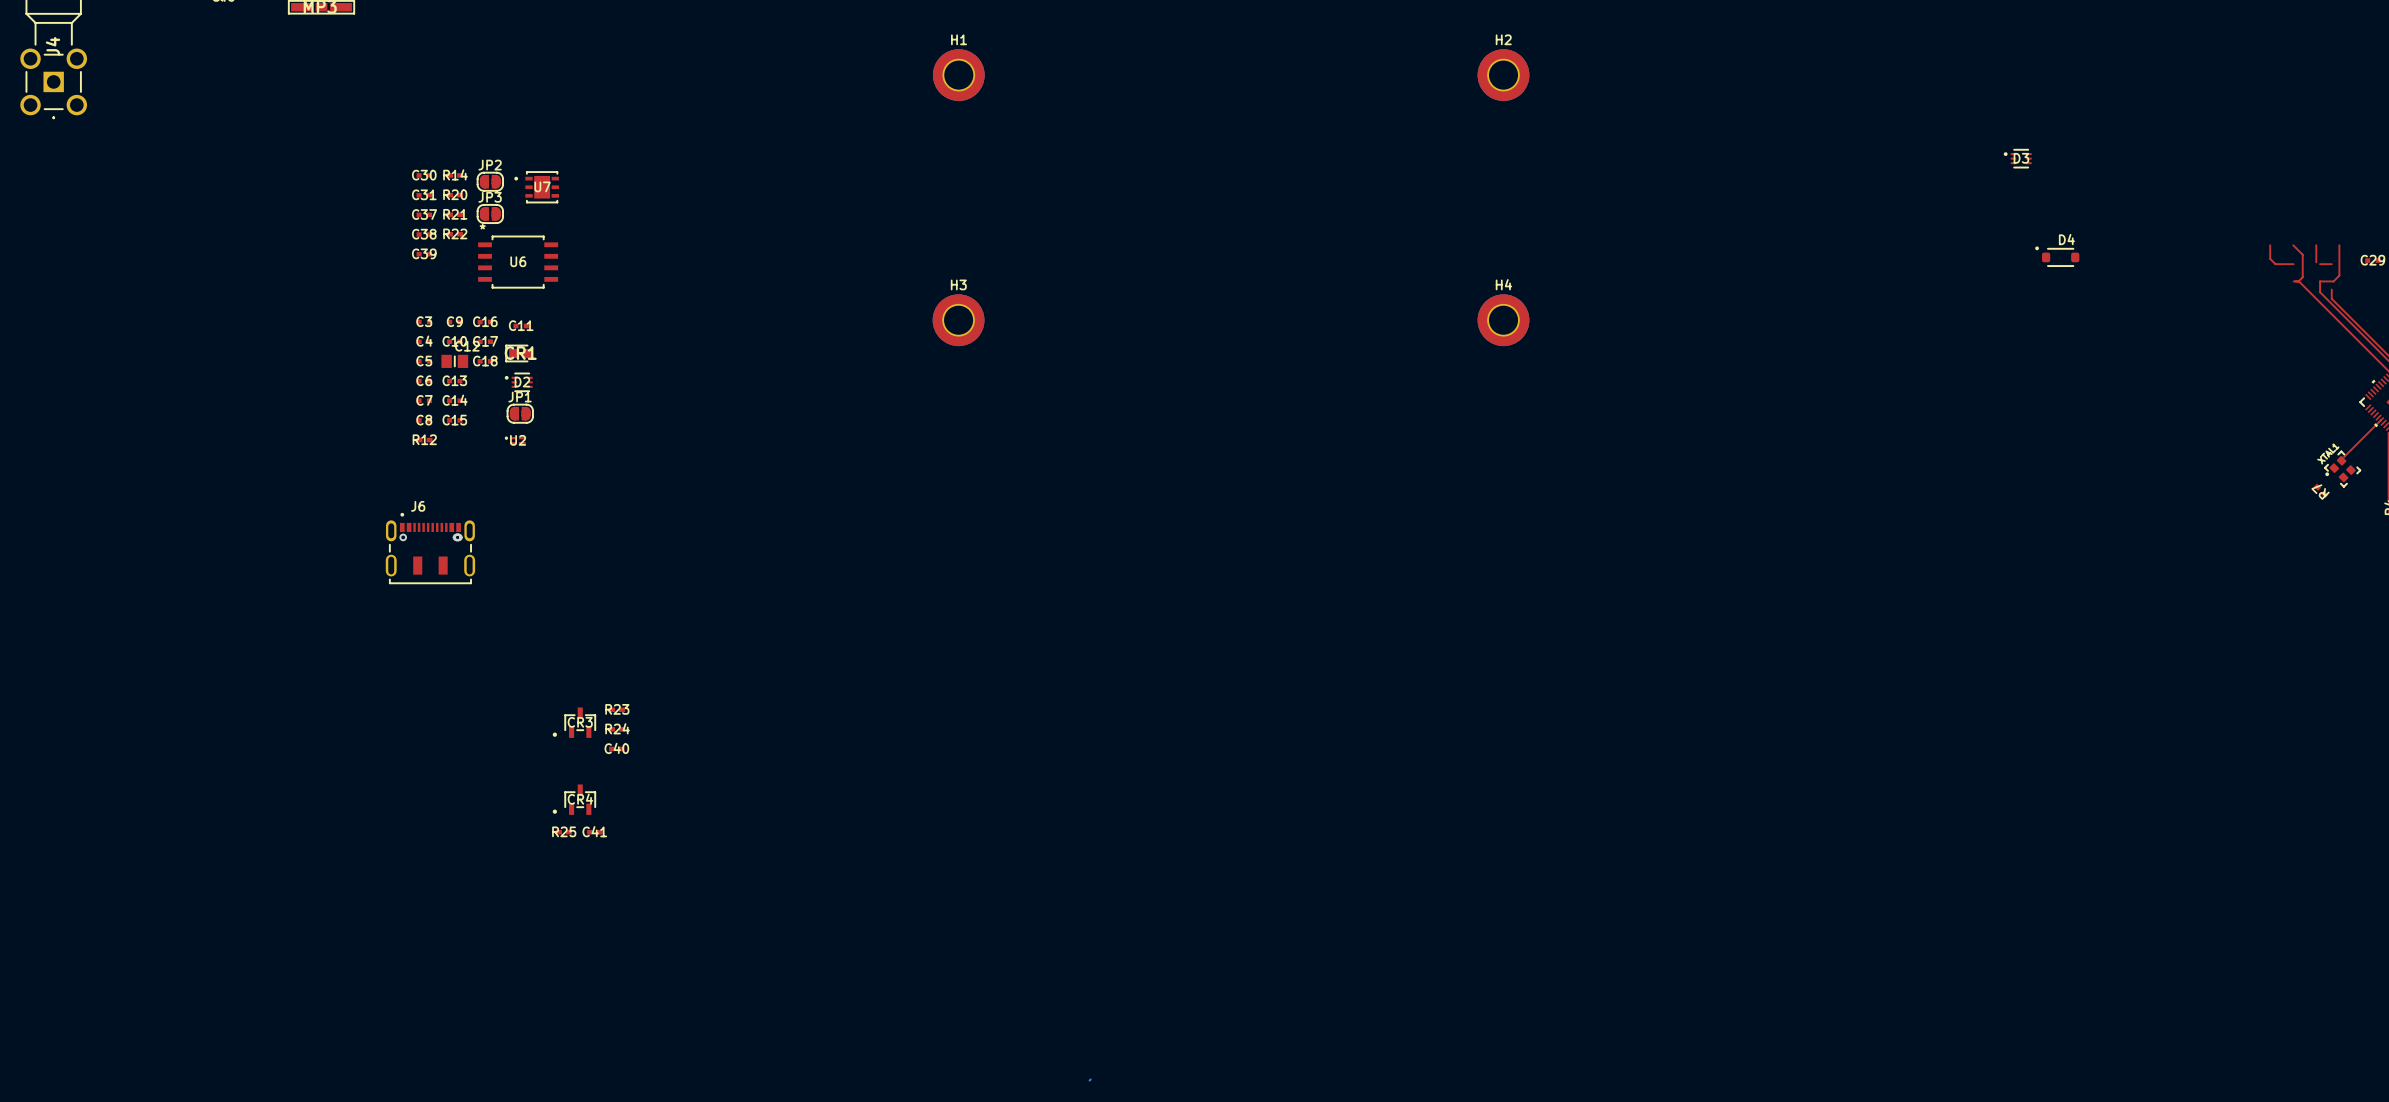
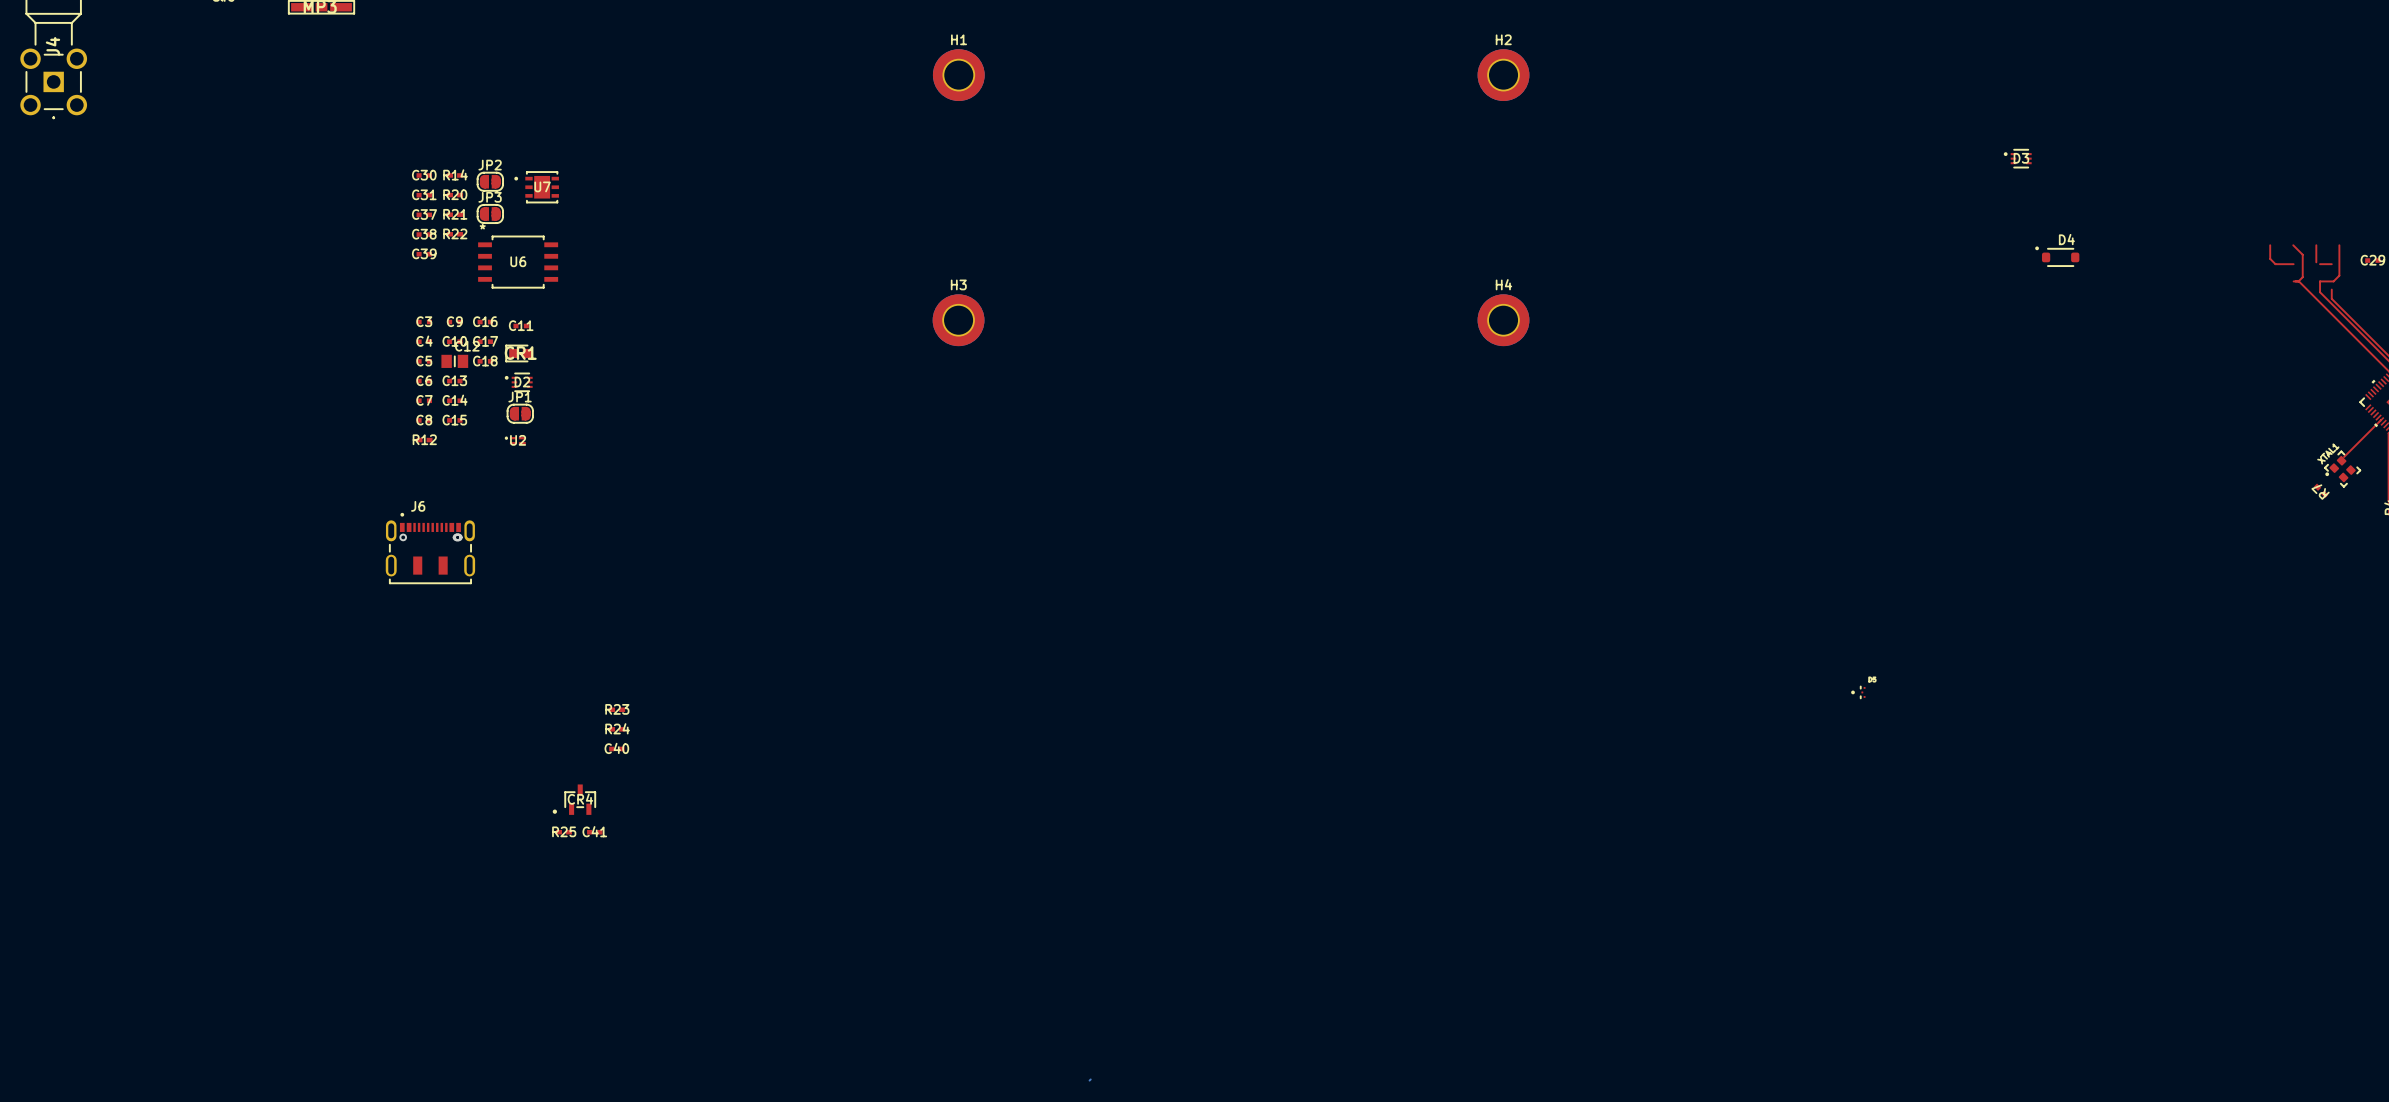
part: none -> (1858, 692)
CR3: (574, 722) -> none

